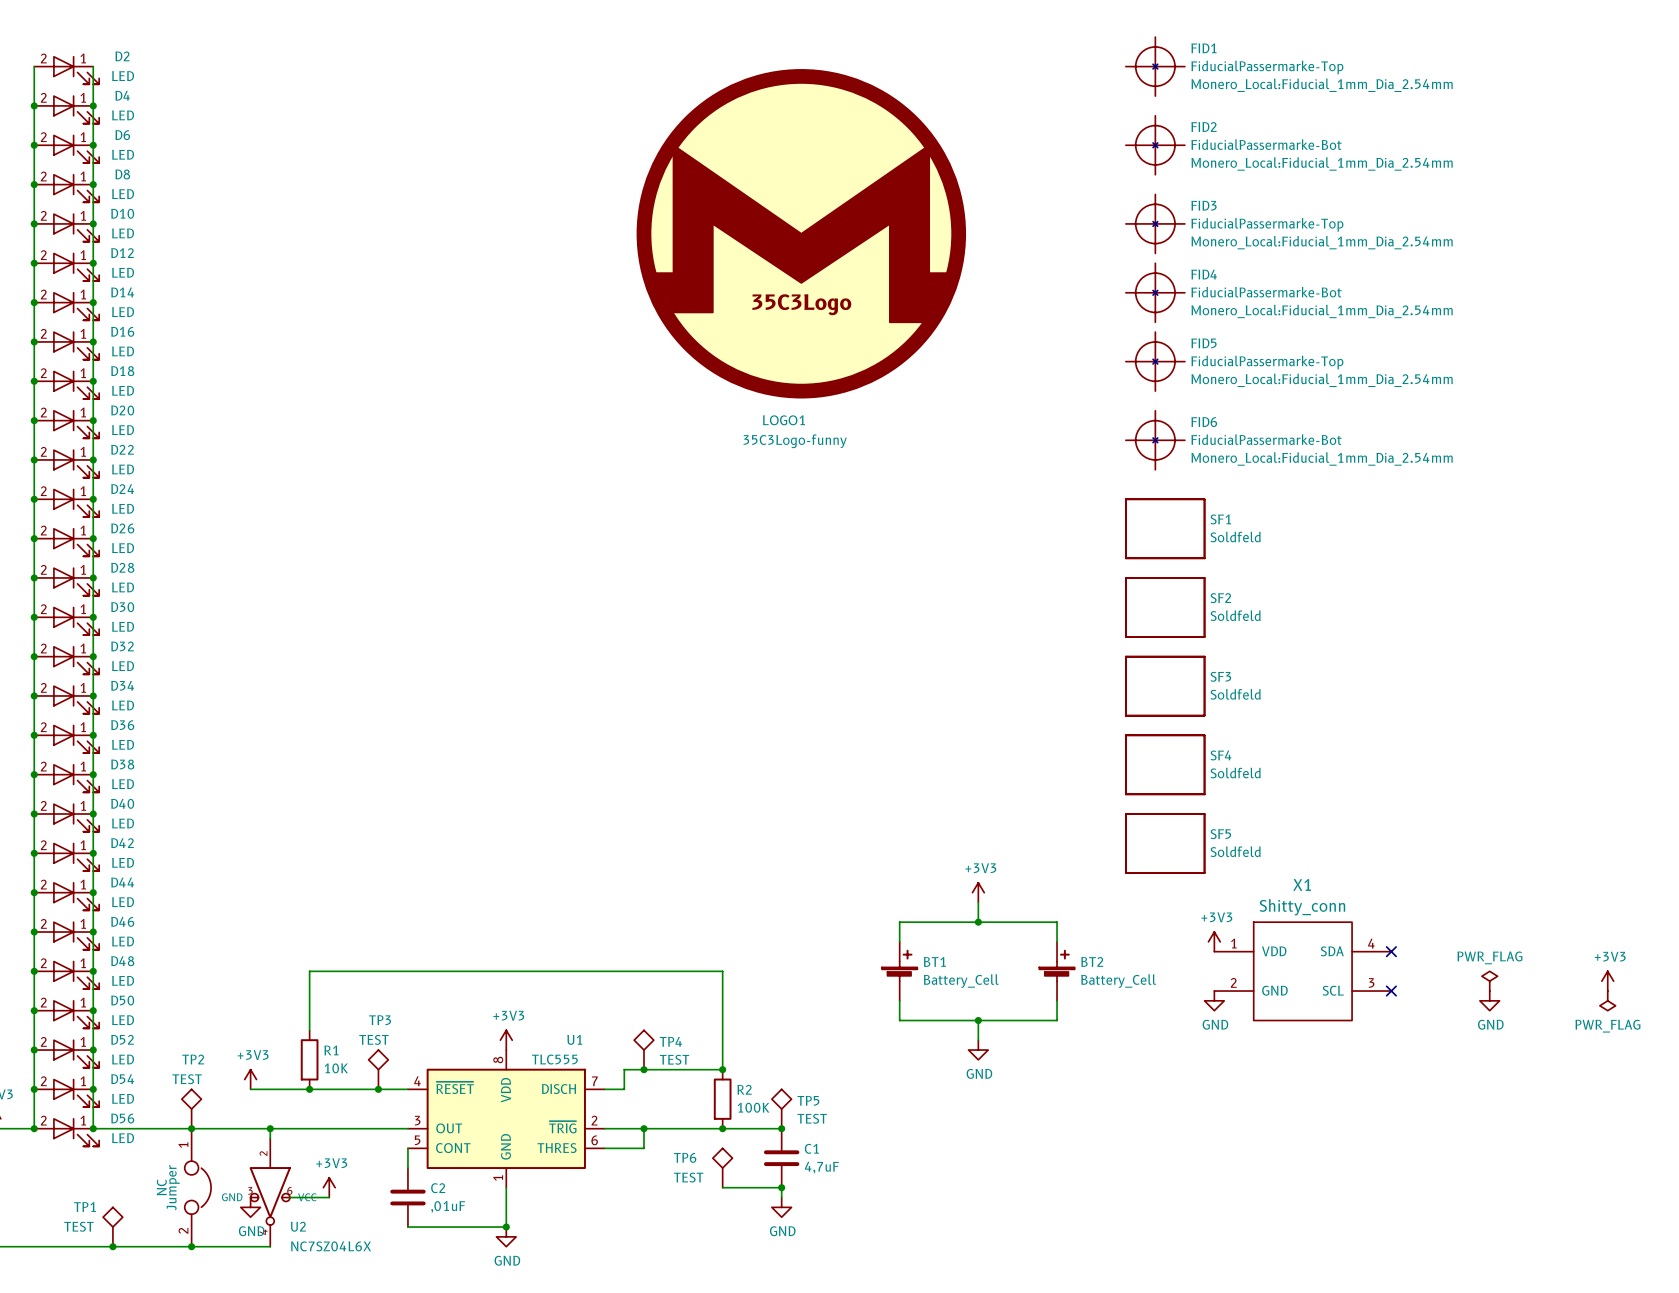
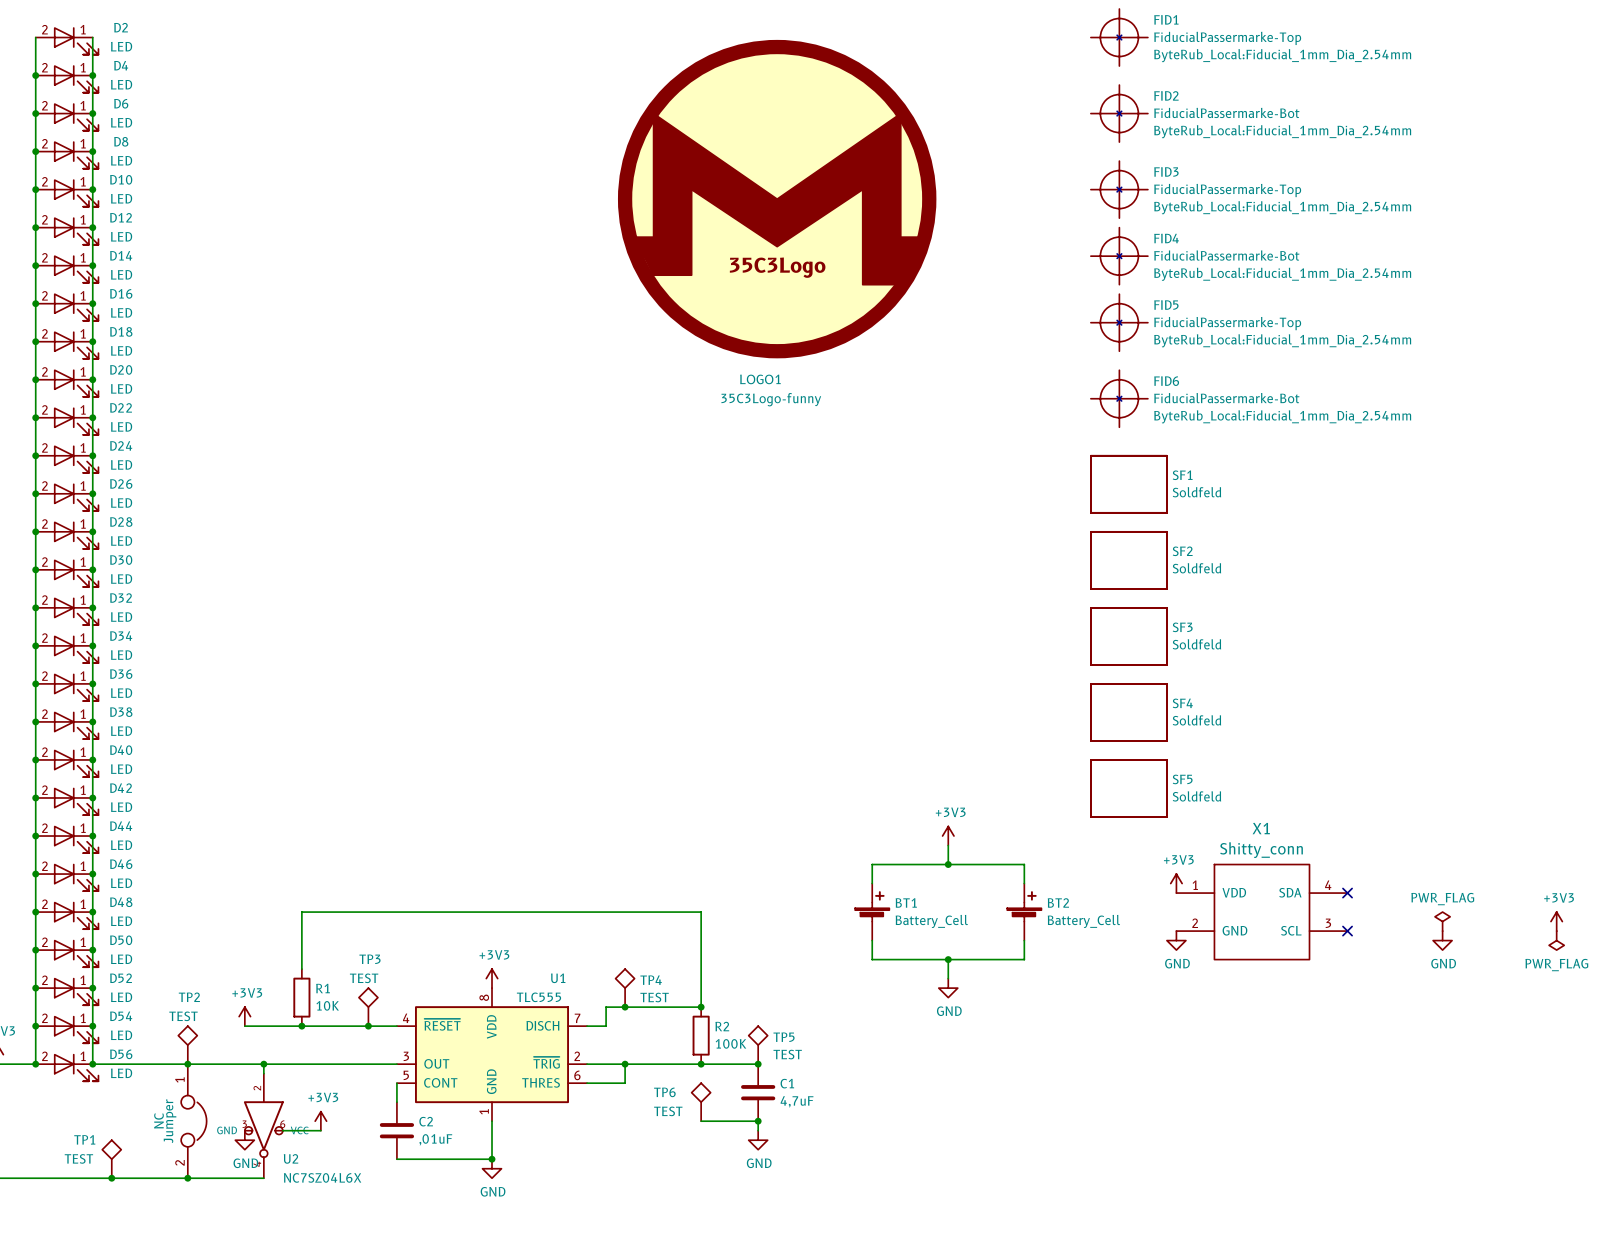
FID1 text: Monero_Local:Fiducial_1mm_Dia_2.54mm (1322, 85) -> ByteRub_Local:Fiducial_1mm_Dia_2.54mm (1282, 55)
FID2 text: Monero_Local:Fiducial_1mm_Dia_2.54mm (1322, 163) -> ByteRub_Local:Fiducial_1mm_Dia_2.54mm (1282, 131)
FID3 text: Monero_Local:Fiducial_1mm_Dia_2.54mm (1322, 242) -> ByteRub_Local:Fiducial_1mm_Dia_2.54mm (1282, 207)
FID4 text: Monero_Local:Fiducial_1mm_Dia_2.54mm (1322, 311) -> ByteRub_Local:Fiducial_1mm_Dia_2.54mm (1282, 274)
FID5 text: Monero_Local:Fiducial_1mm_Dia_2.54mm (1322, 380) -> ByteRub_Local:Fiducial_1mm_Dia_2.54mm (1282, 340)
FID6 text: Monero_Local:Fiducial_1mm_Dia_2.54mm (1322, 458) -> ByteRub_Local:Fiducial_1mm_Dia_2.54mm (1282, 416)

